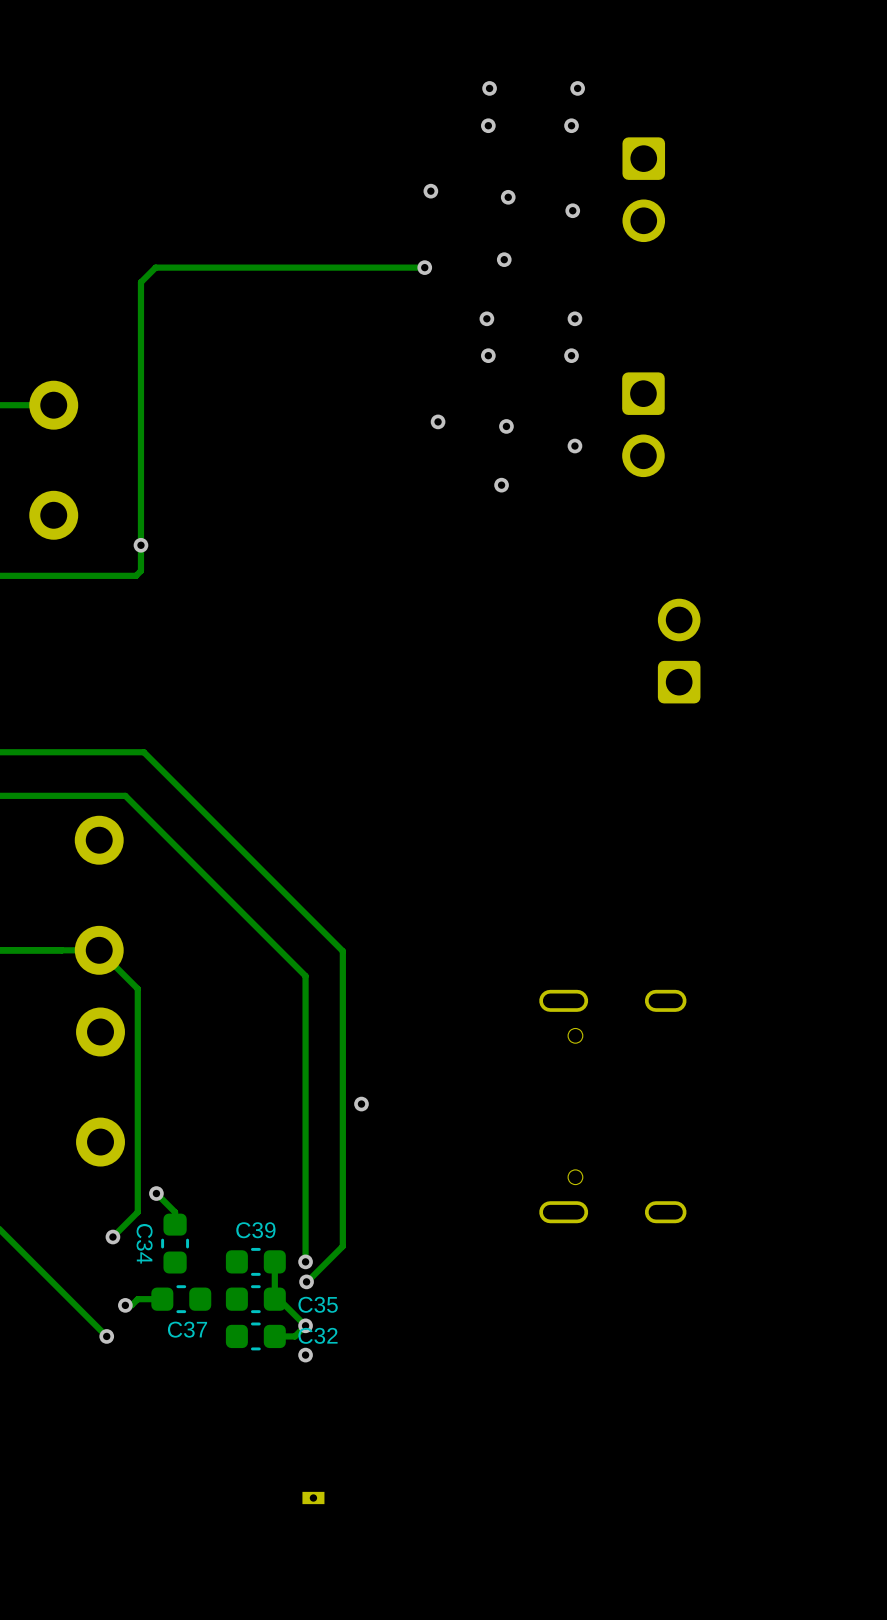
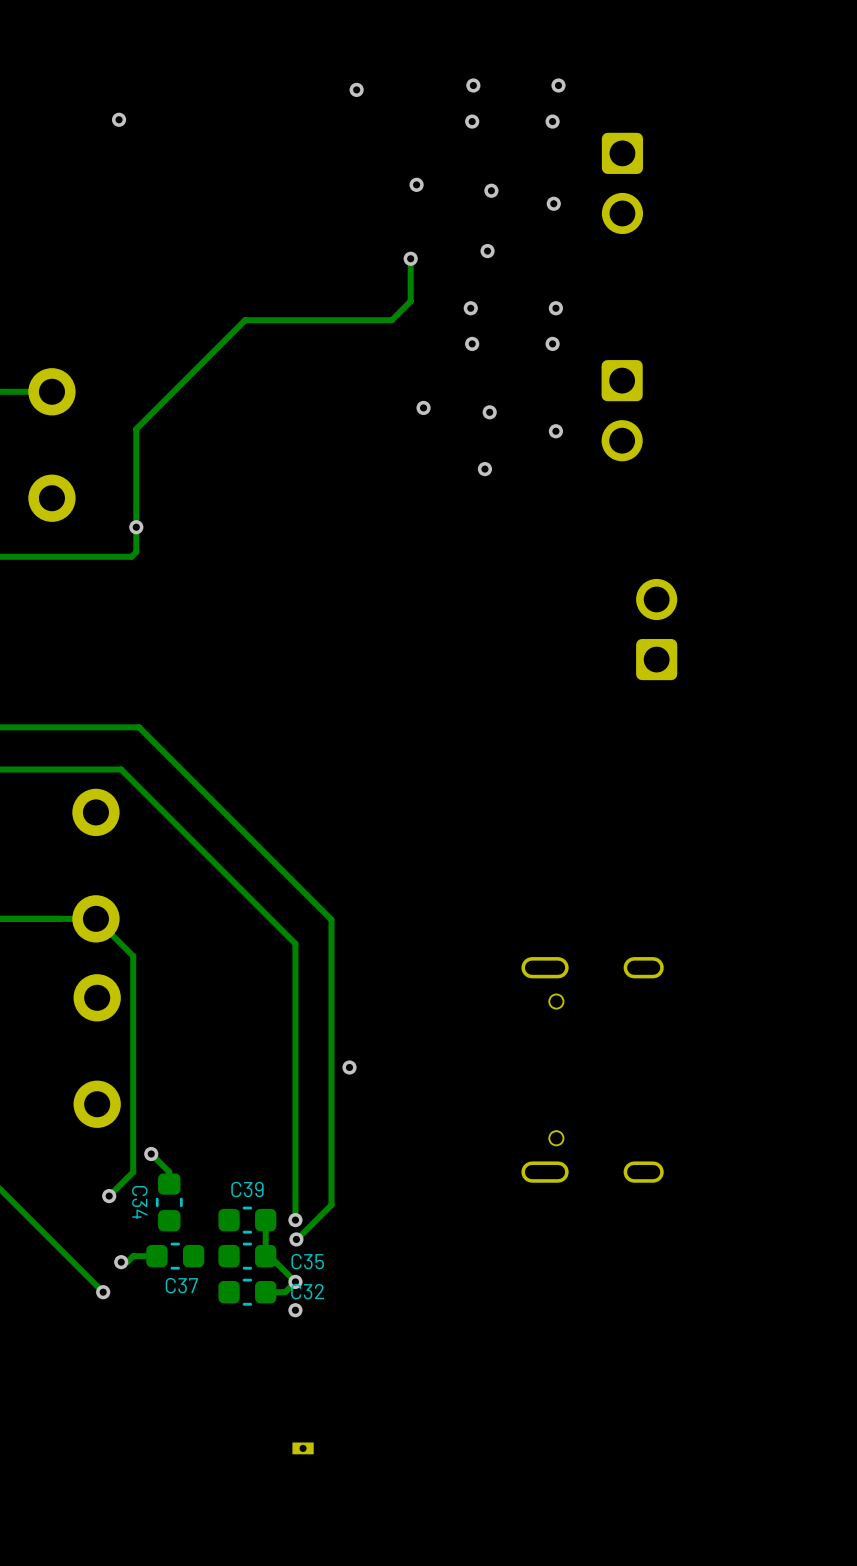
via: none -> (356, 89)
via: none -> (119, 119)
track: (424, 267) (155, 267) (140, 282) (140, 443) -> (410, 258) (410, 301) (391, 320) (245, 320) (136, 429)

